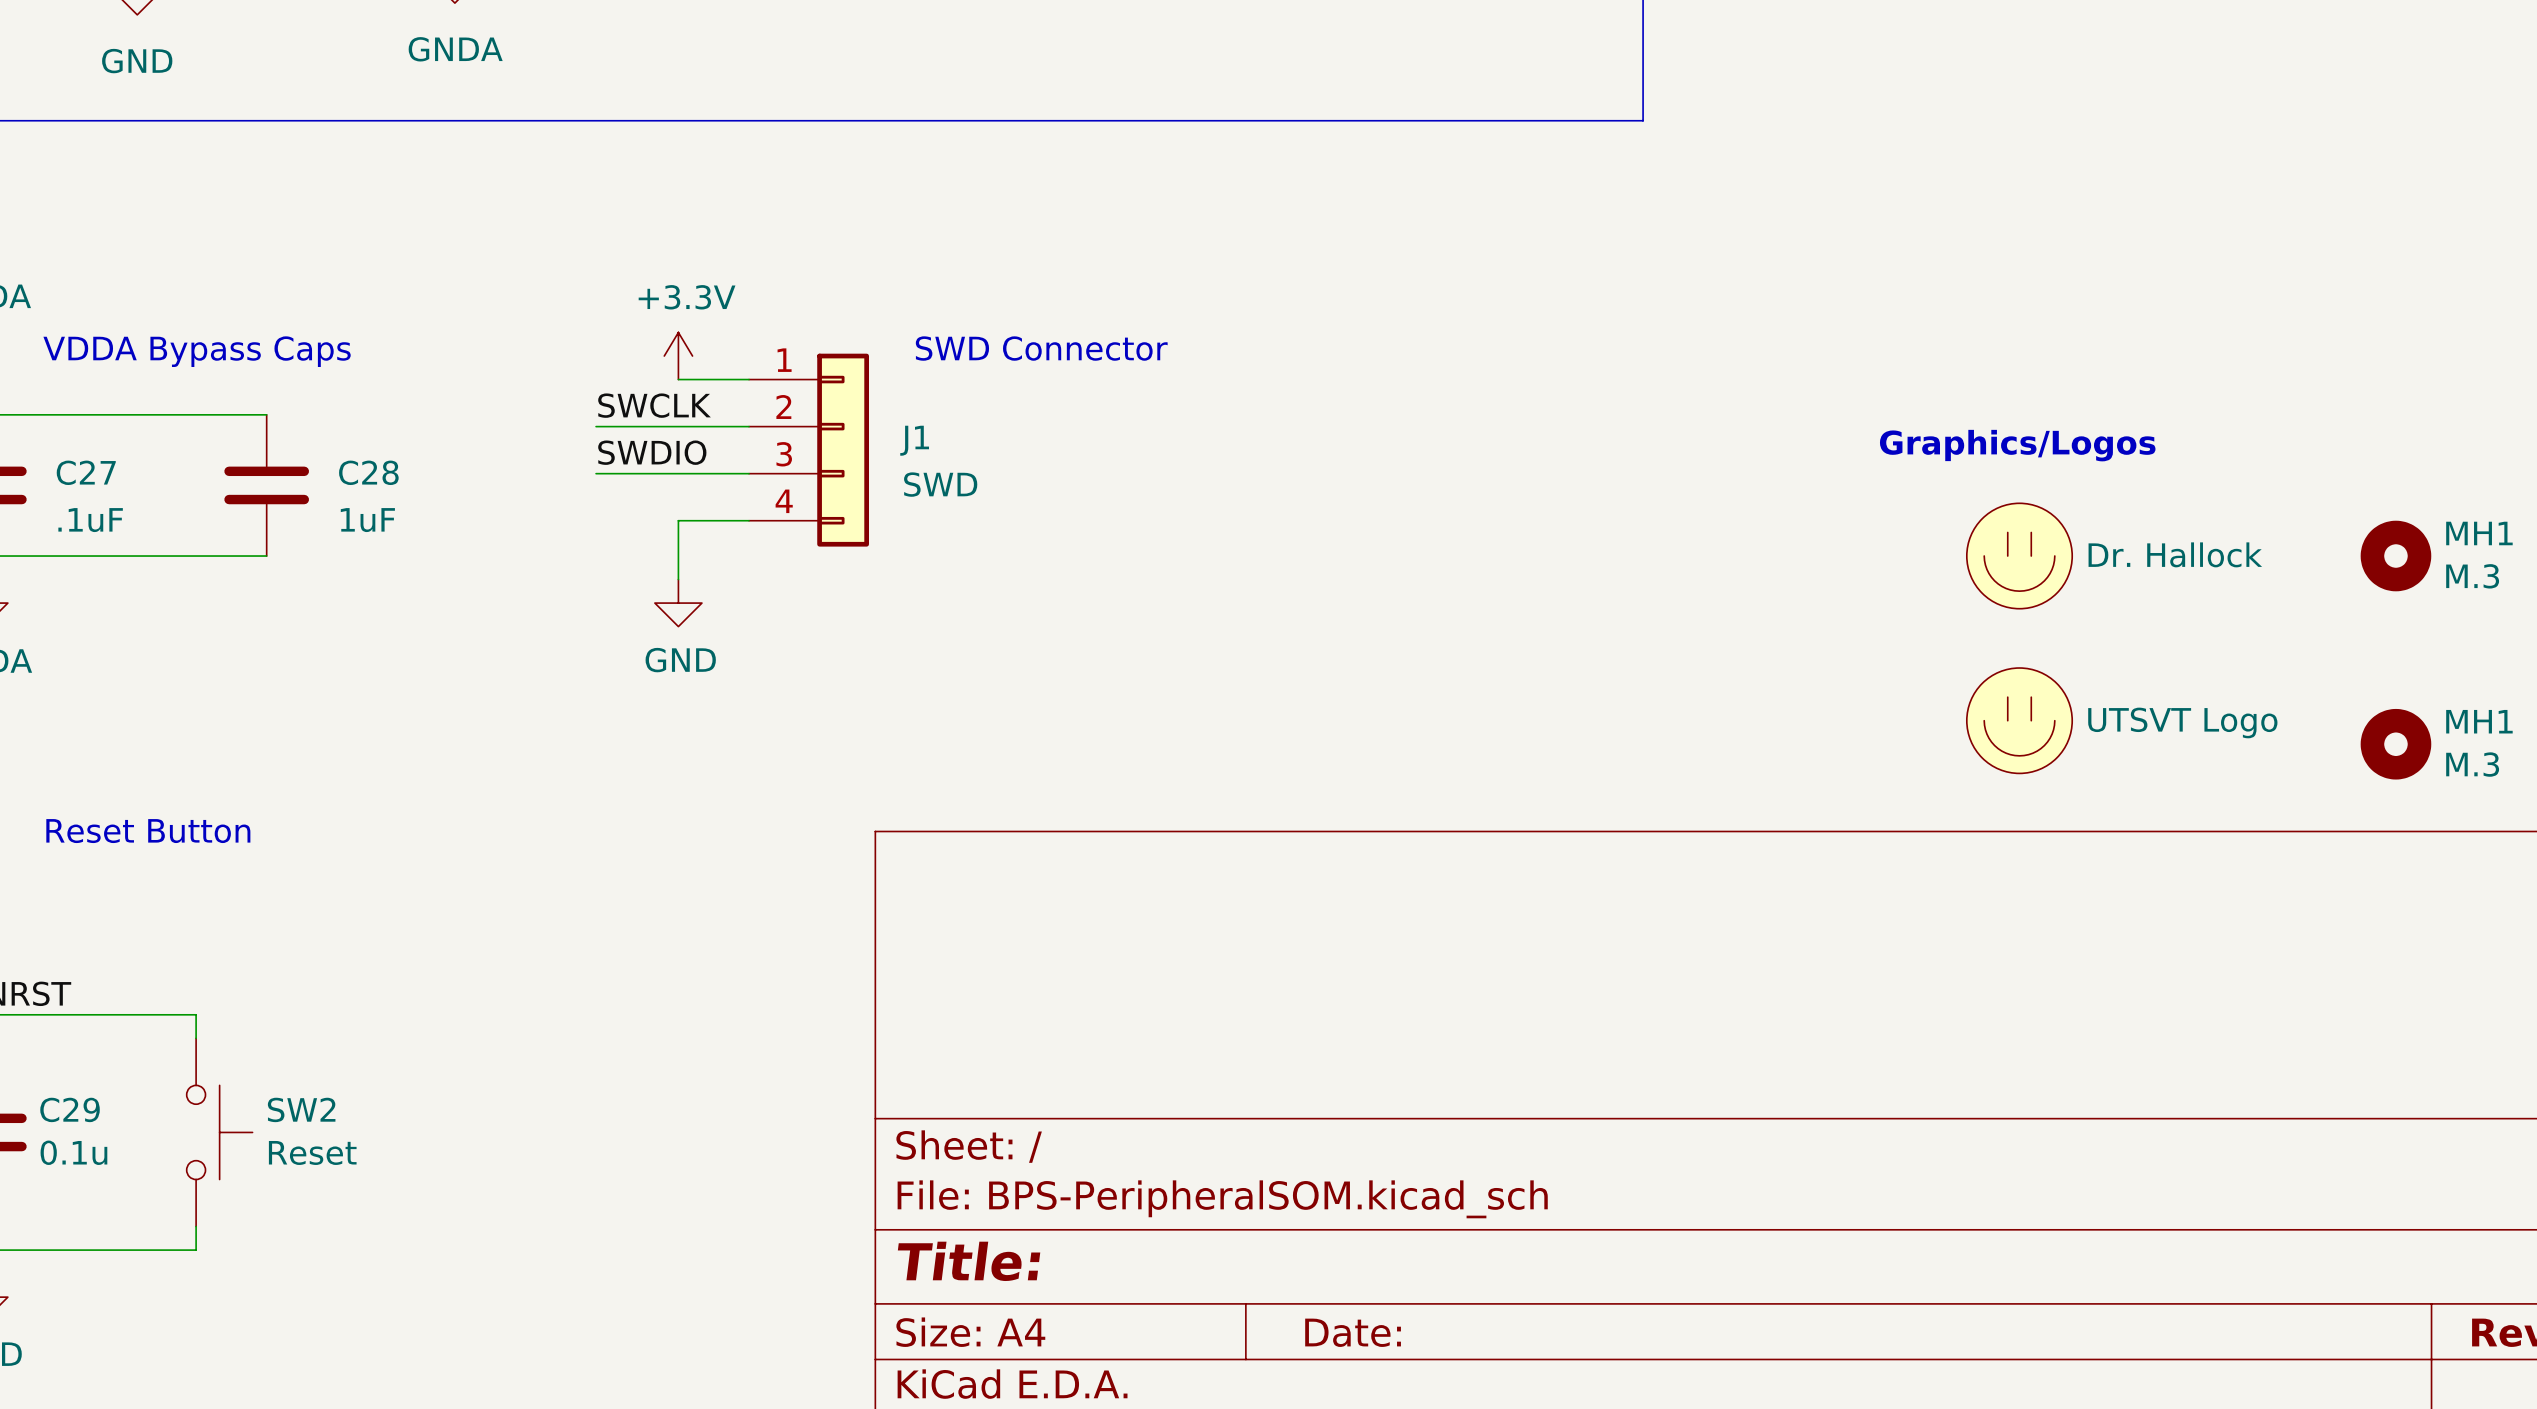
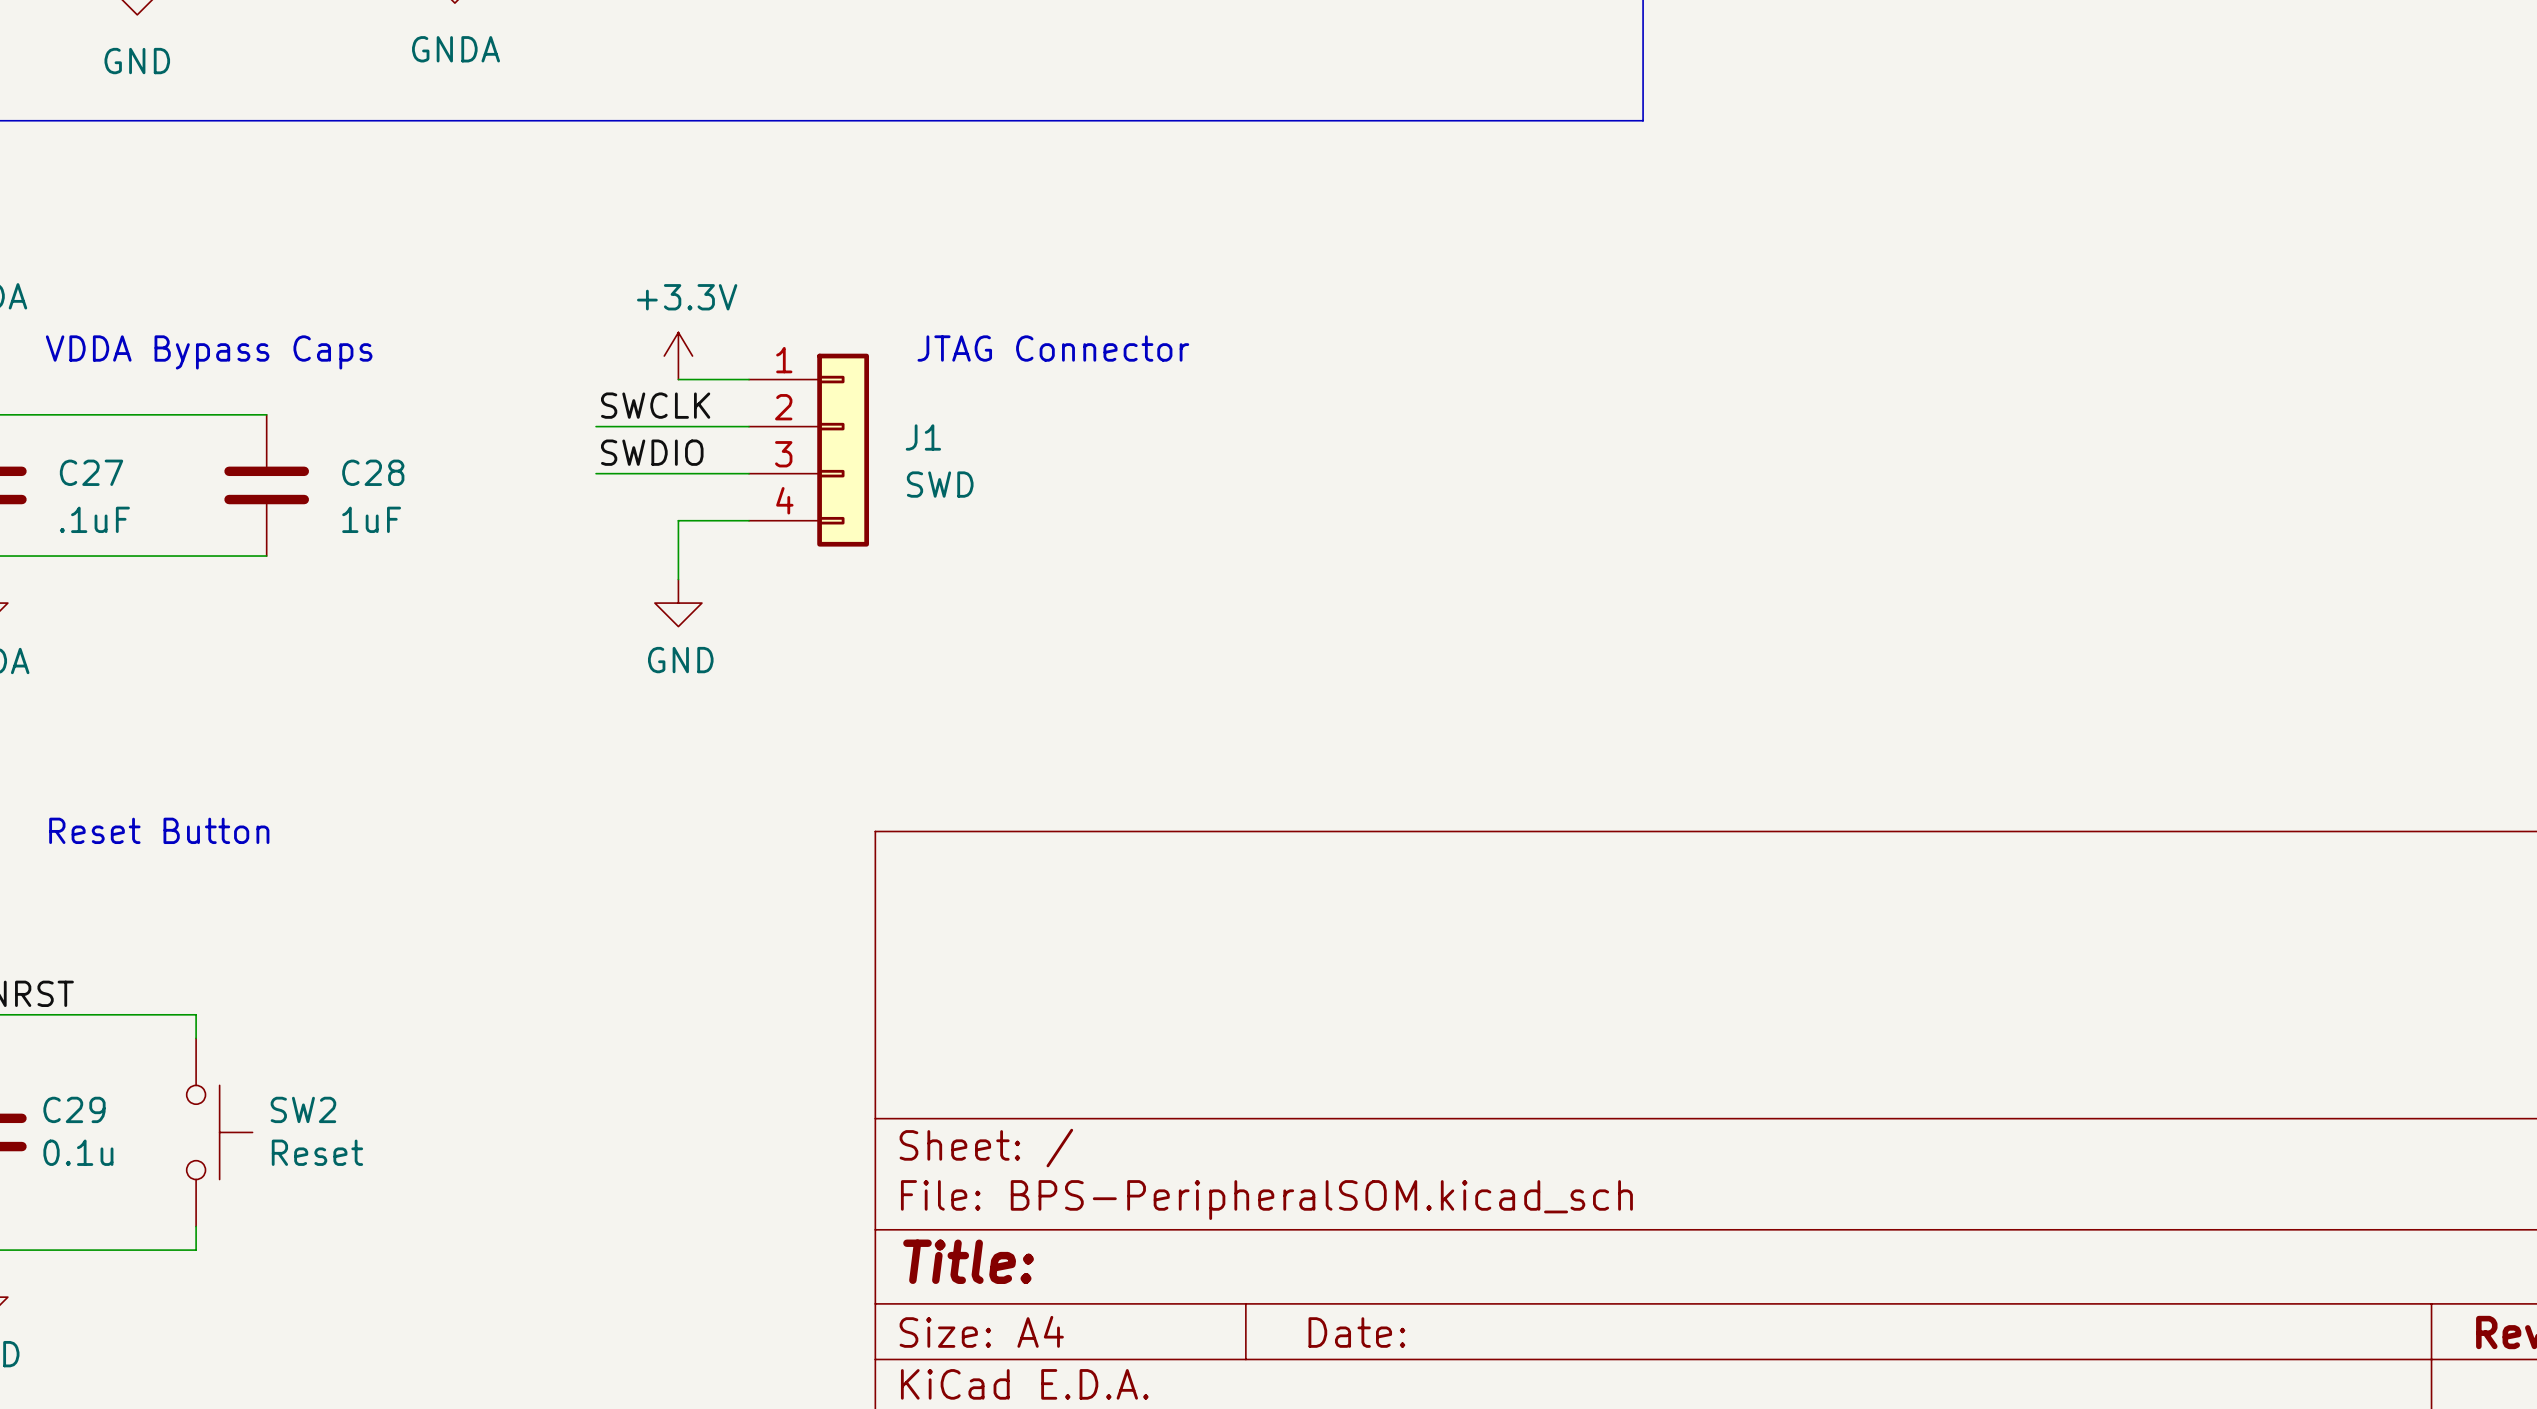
text: SWD Connector (1041, 348) -> JTAG Connector (1053, 348)
text: Graphics/Logos (2017, 445) -> none
part: Dr. Hallock (2019, 556) -> none
MH1: M.3 (2395, 556) -> none
part: UTSVT Logo (2019, 720) -> none
MH1: M.3 (2395, 744) -> none

